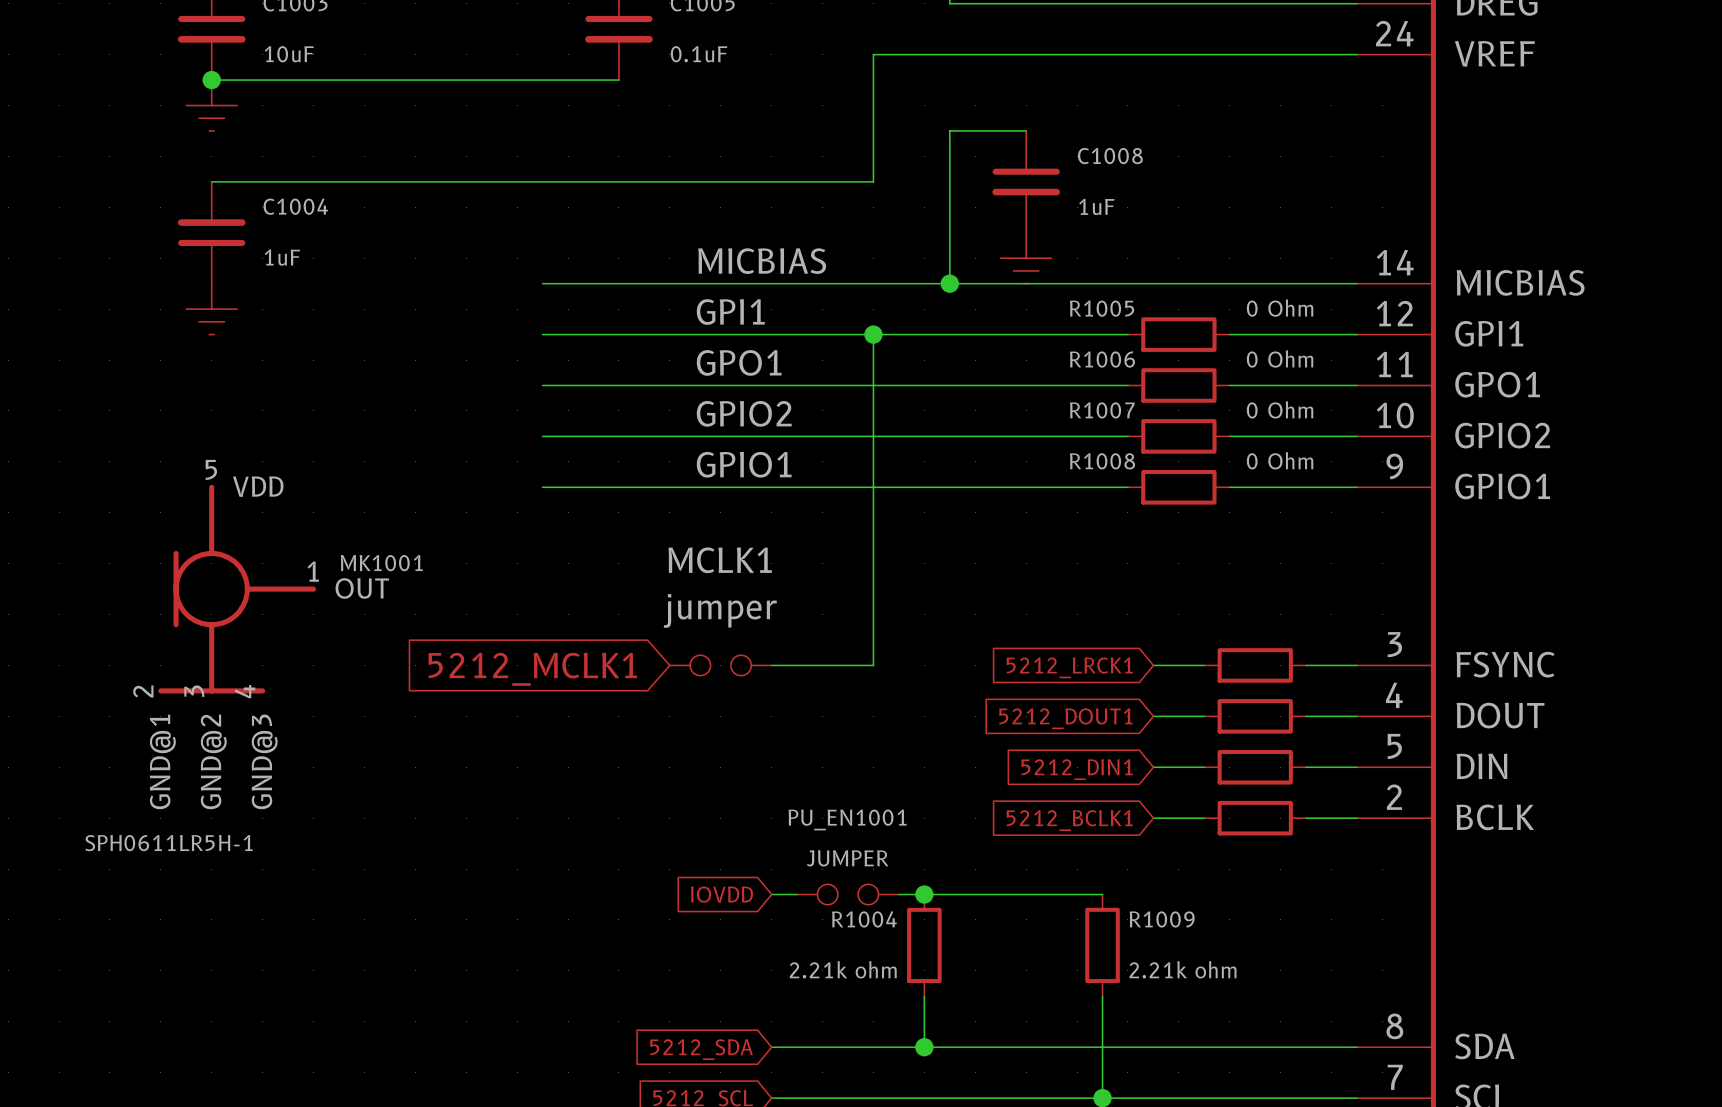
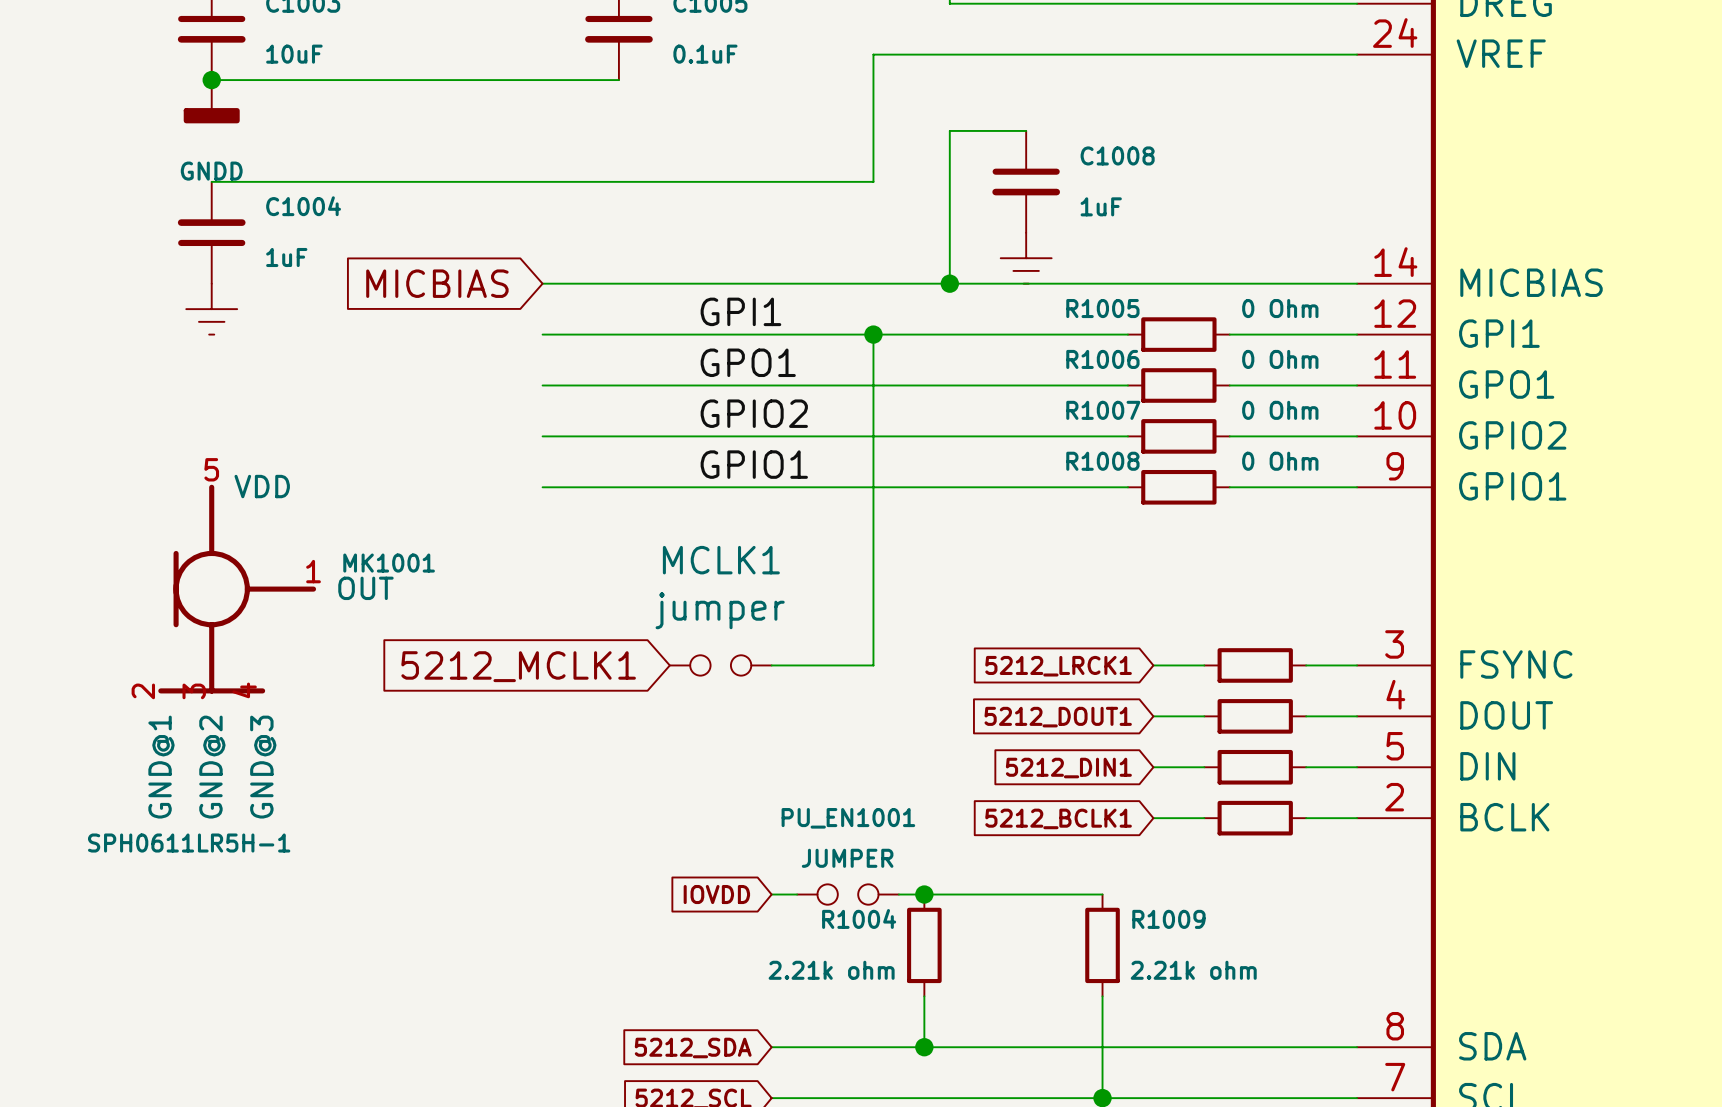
power symbol shape: [186, 80, 238, 131] -> [183, 80, 240, 124]
power symbol text: none -> GNDD (211, 171)
label: MICBIAS (762, 261) -> none
global label: none -> MICBIAS (437, 283)

